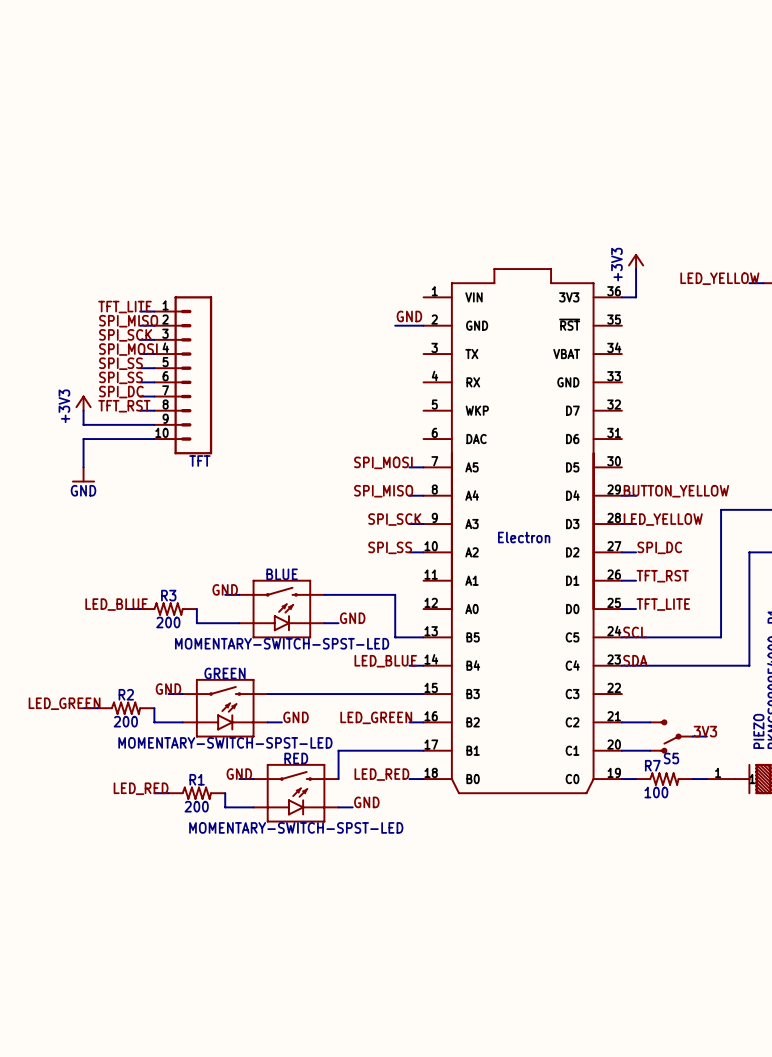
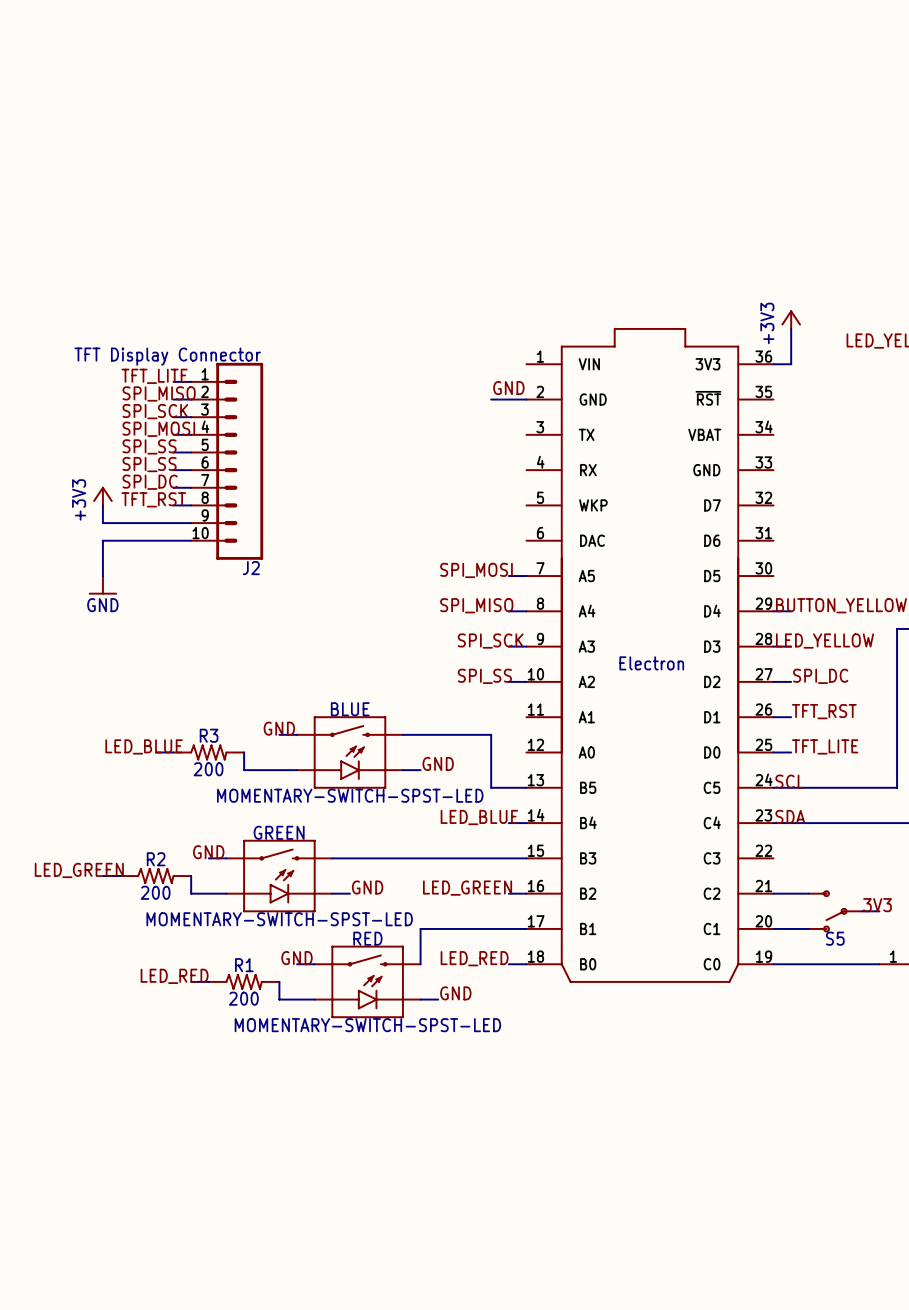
TFT value: none -> TFT Display Connector (167, 356)
TFT name: TFT (199, 460) -> J2 (251, 568)
R7: 100 (664, 779) -> none

